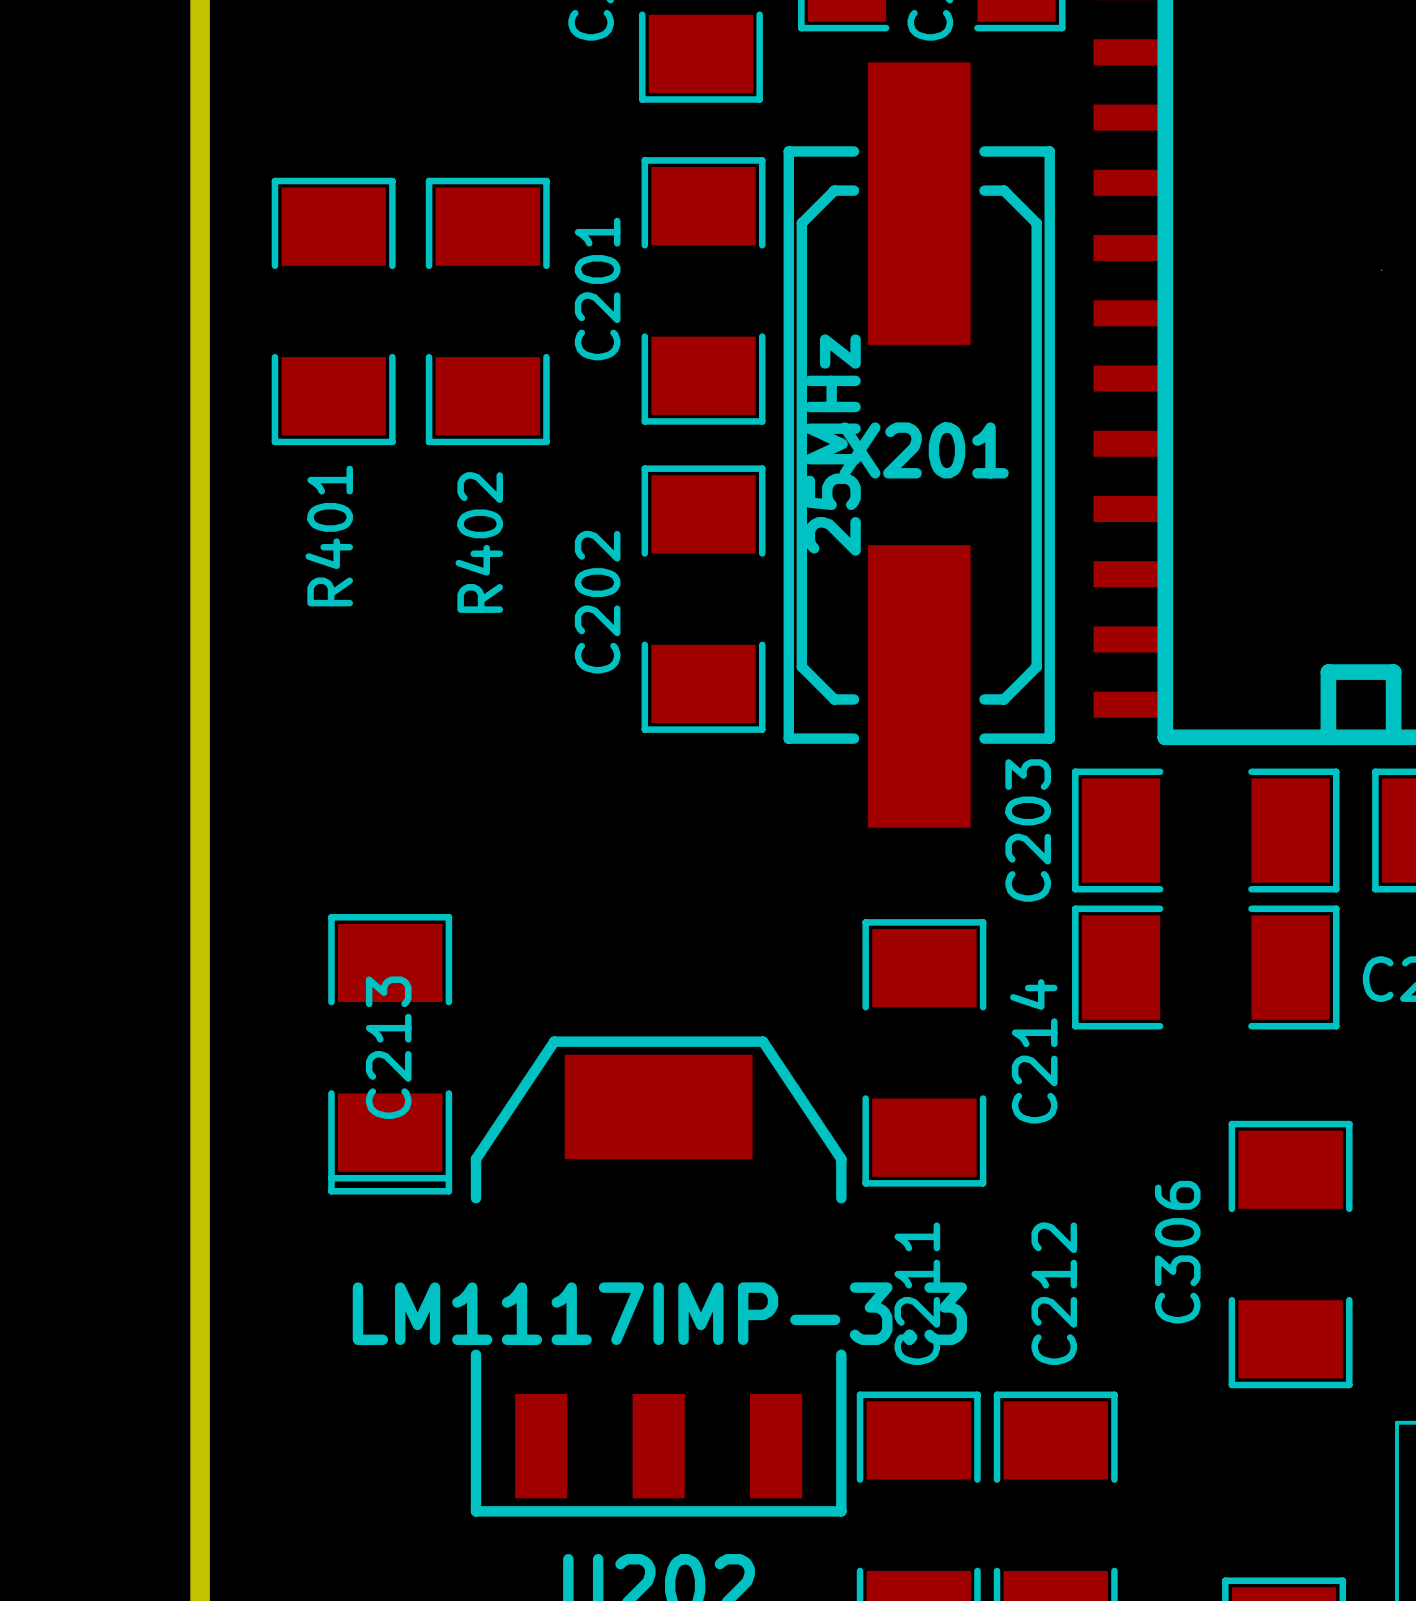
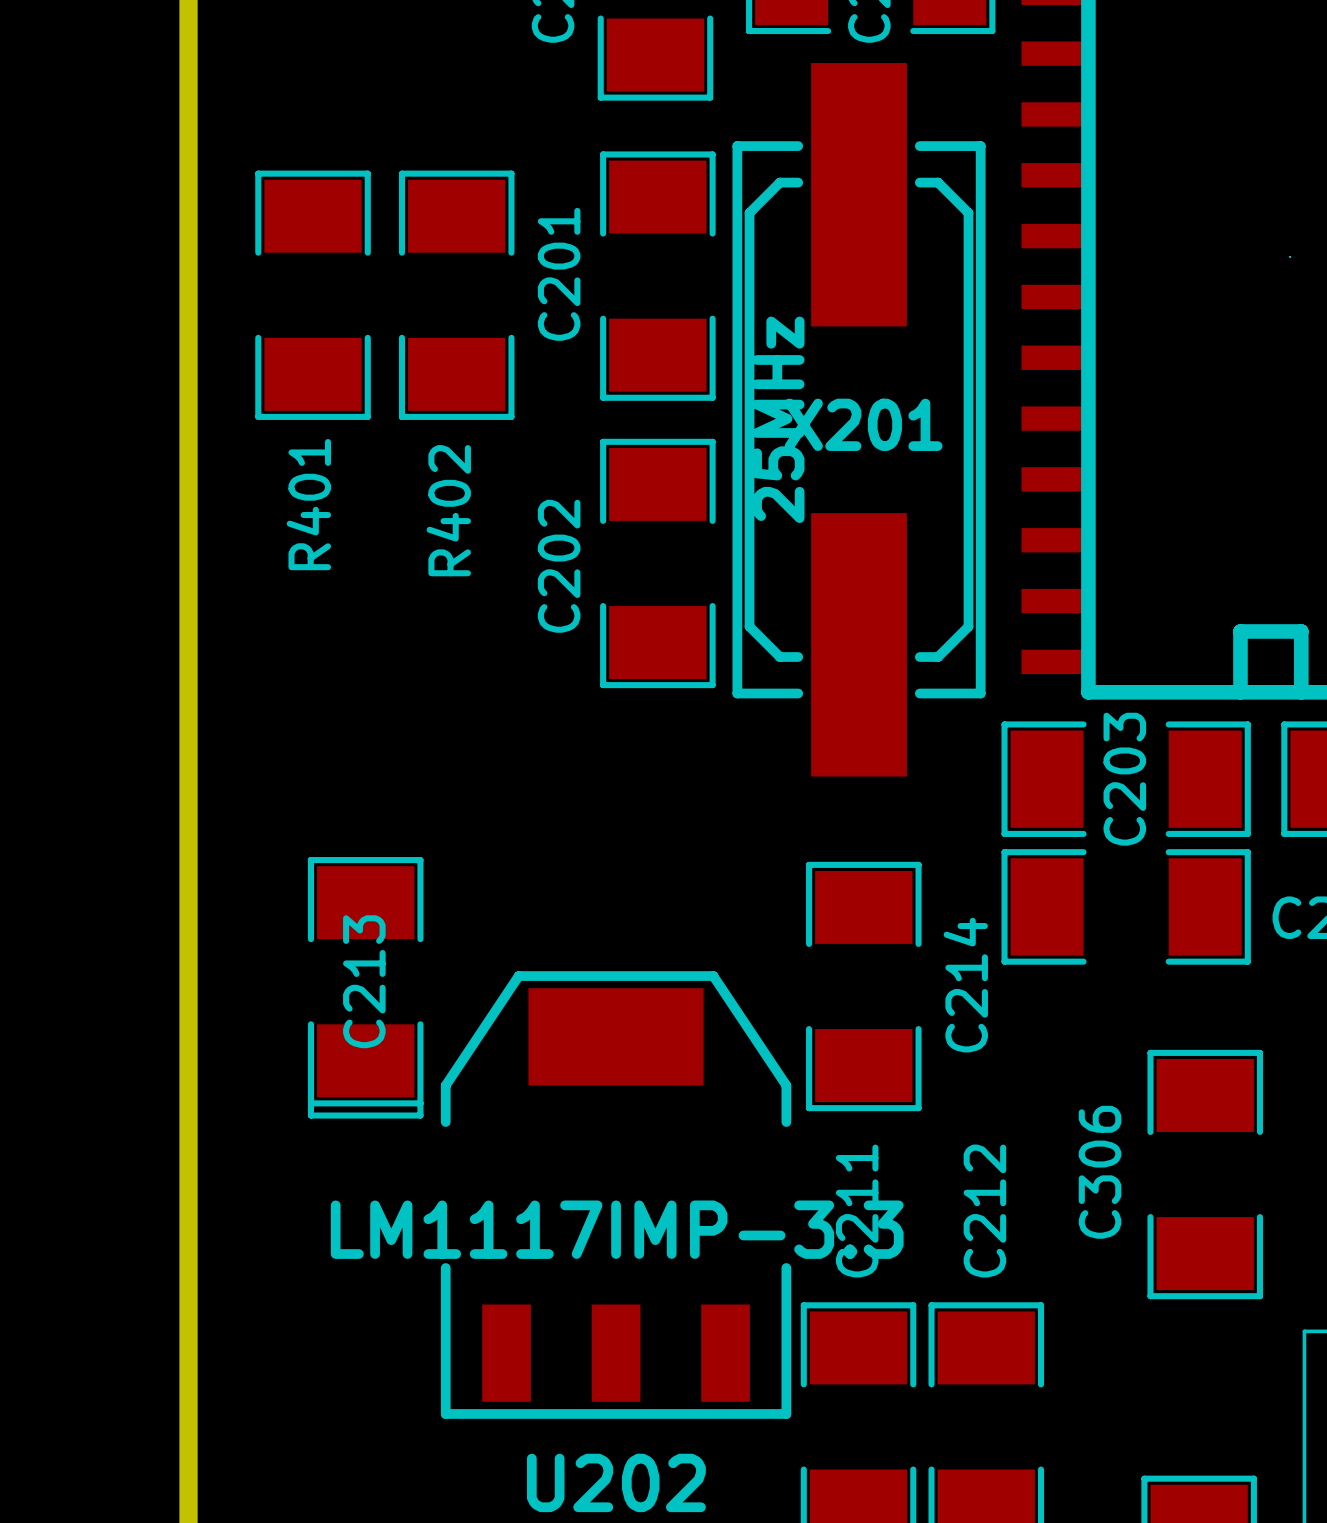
C203 name position: C203 (1028, 830) -> C203 (1124, 779)

